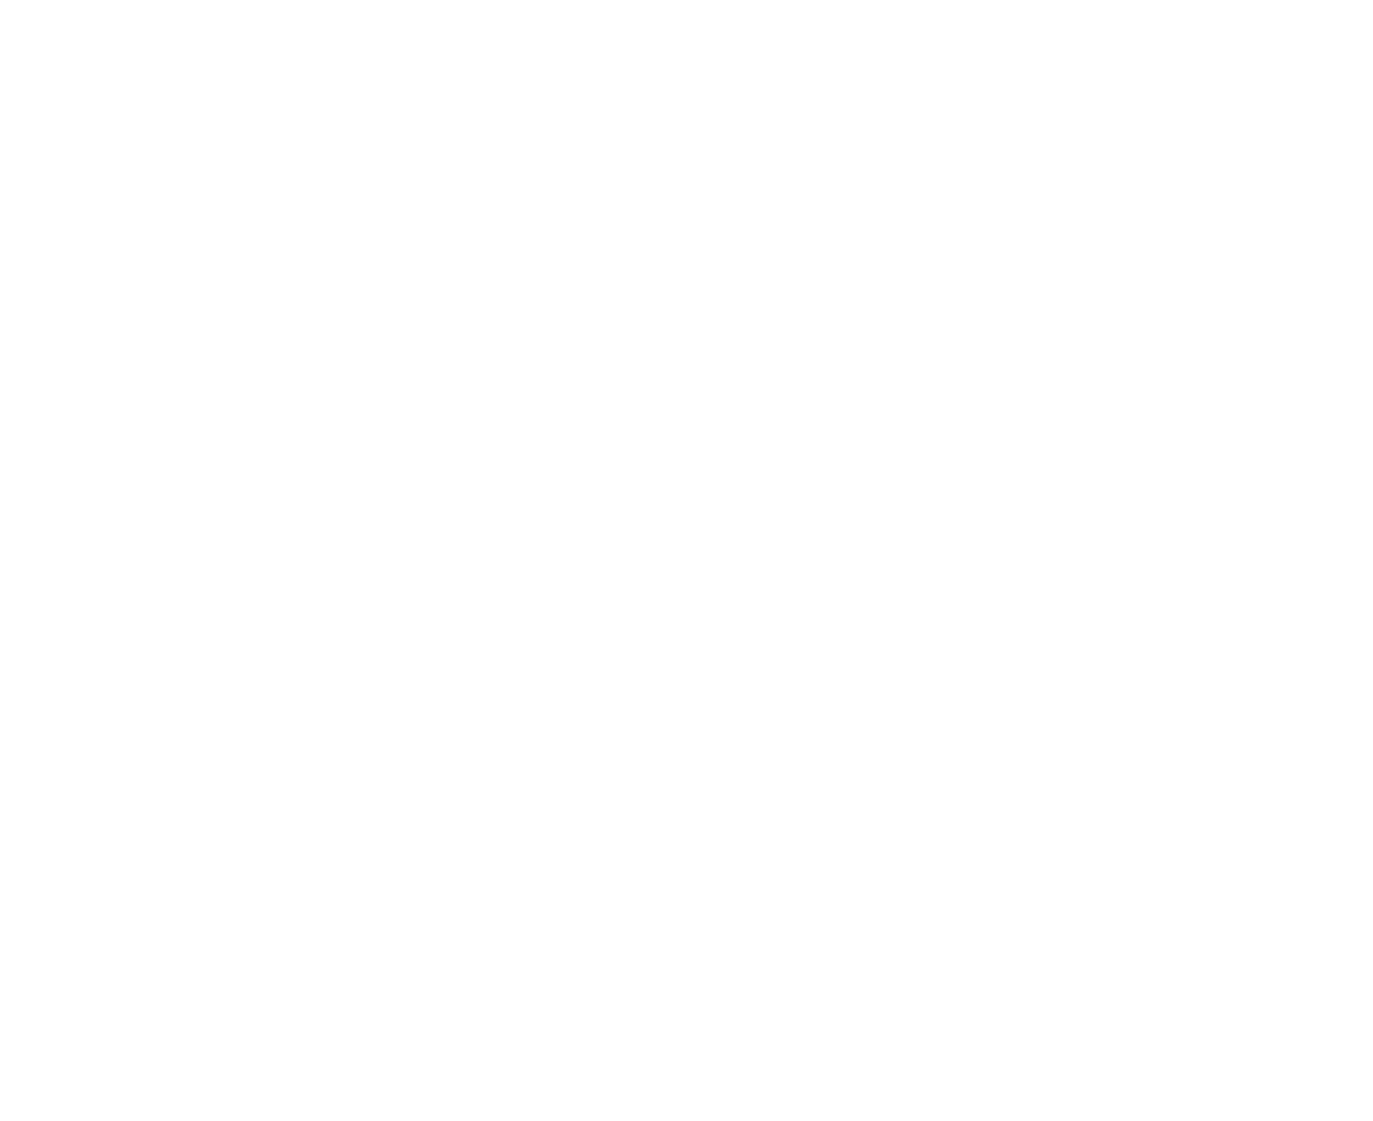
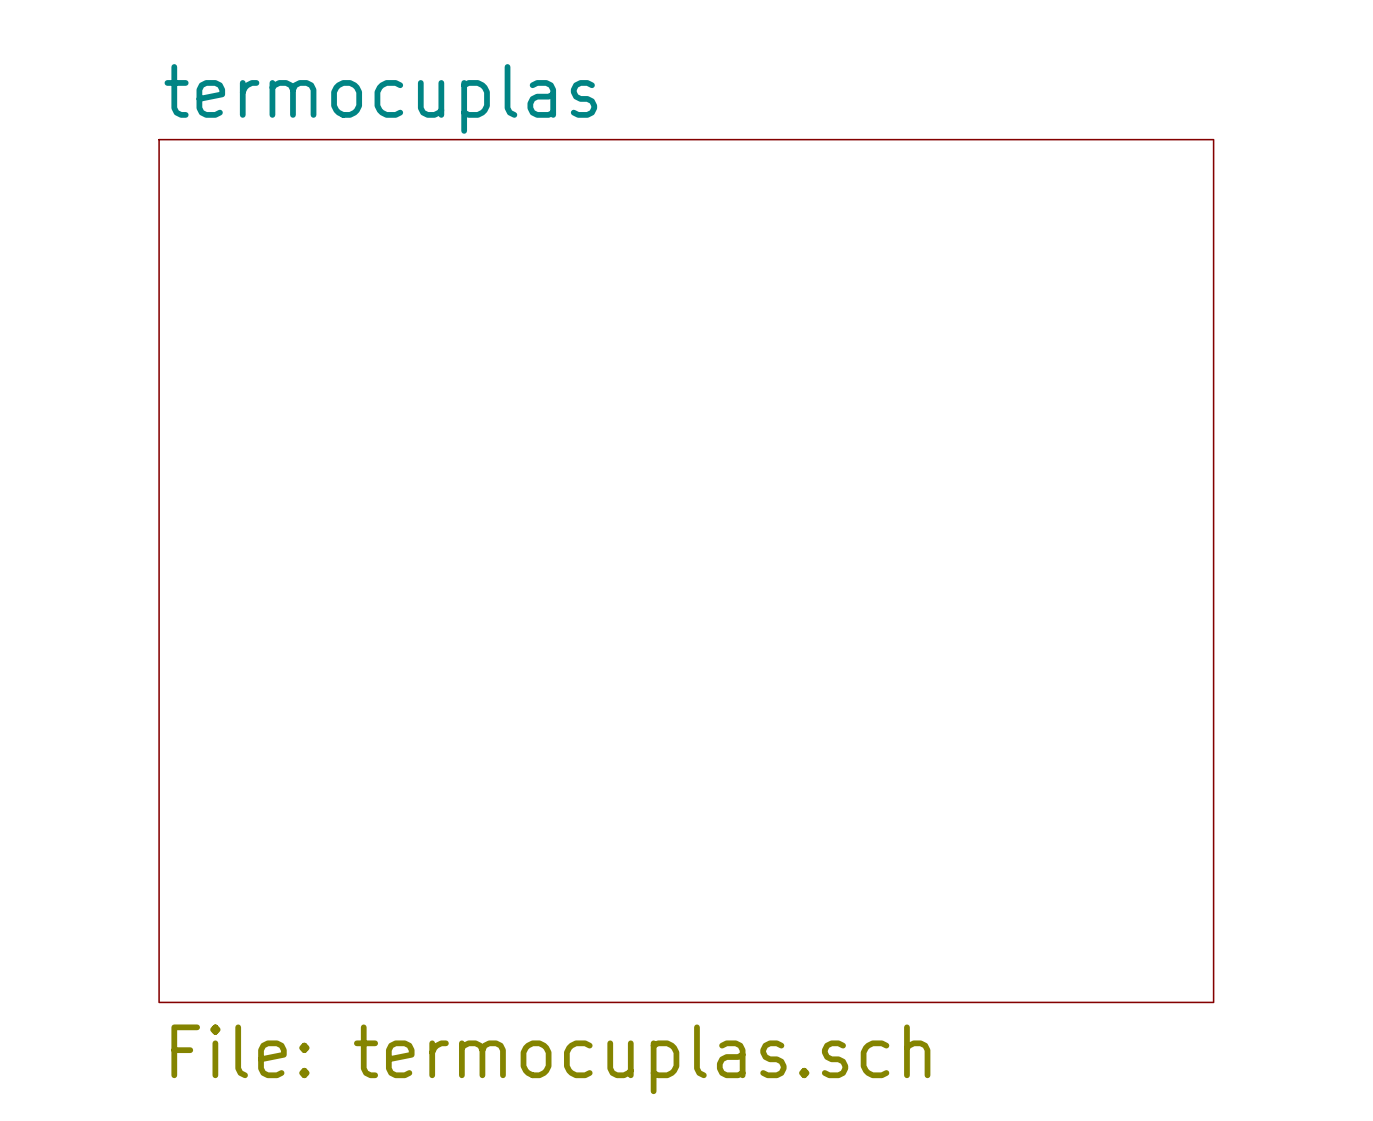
sheet termocuplas: none -> File: termocuplas.sch (686, 571)

